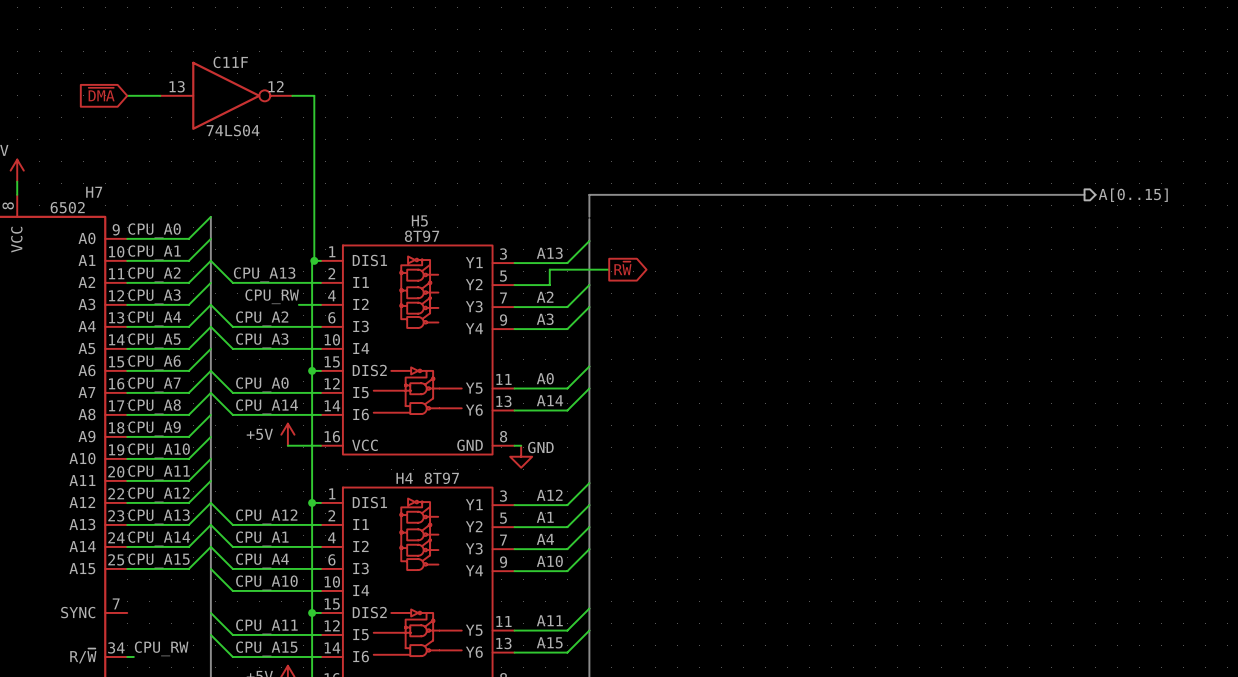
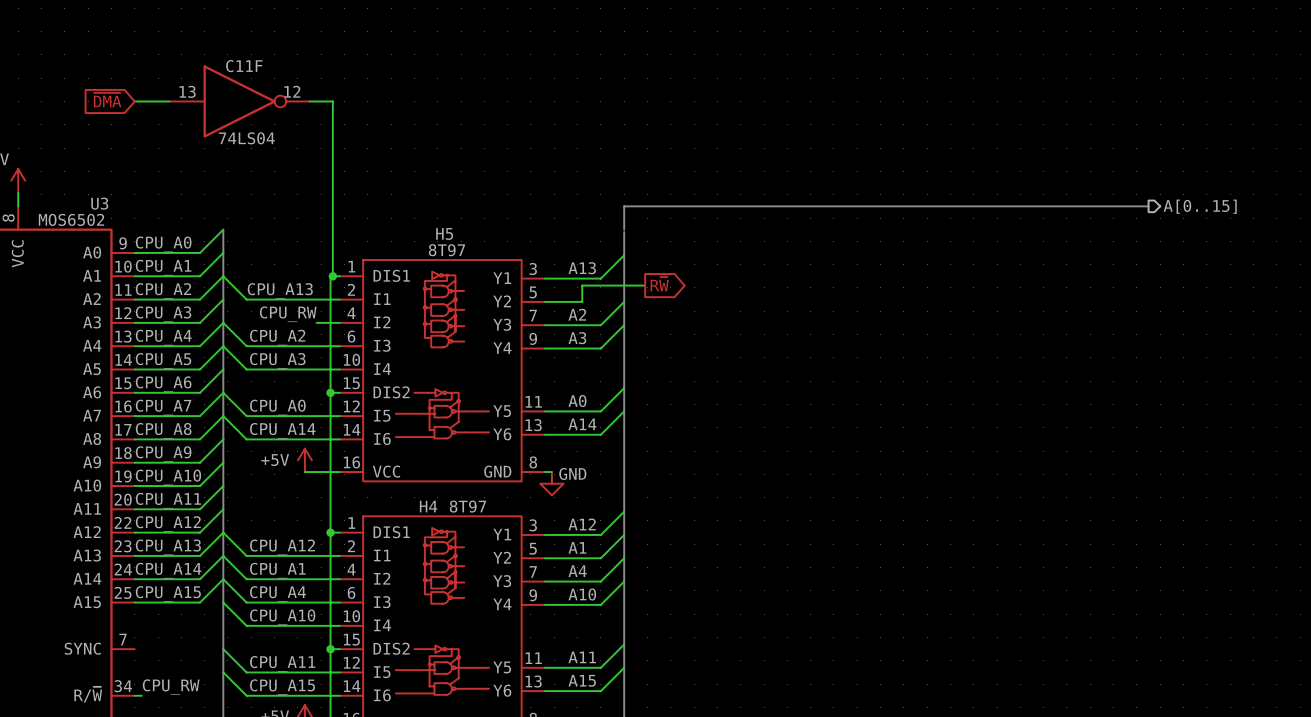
H7 name: H7 (94, 192) -> U3 (99, 203)
H7 value: 6502 (67, 207) -> MOS6502 (71, 219)

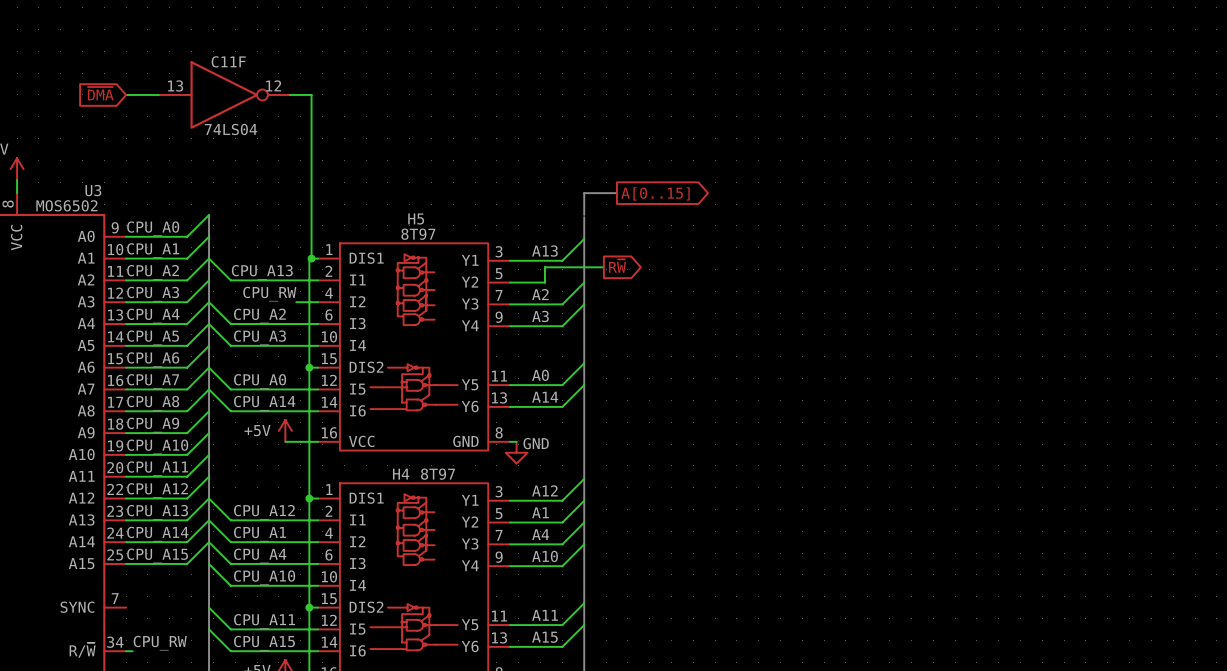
bus: (659, 206) (1148, 206) -> none
hierarchical label: A[0..15] (1200, 206) -> none
global label: none -> A[0..15] (655, 193)

